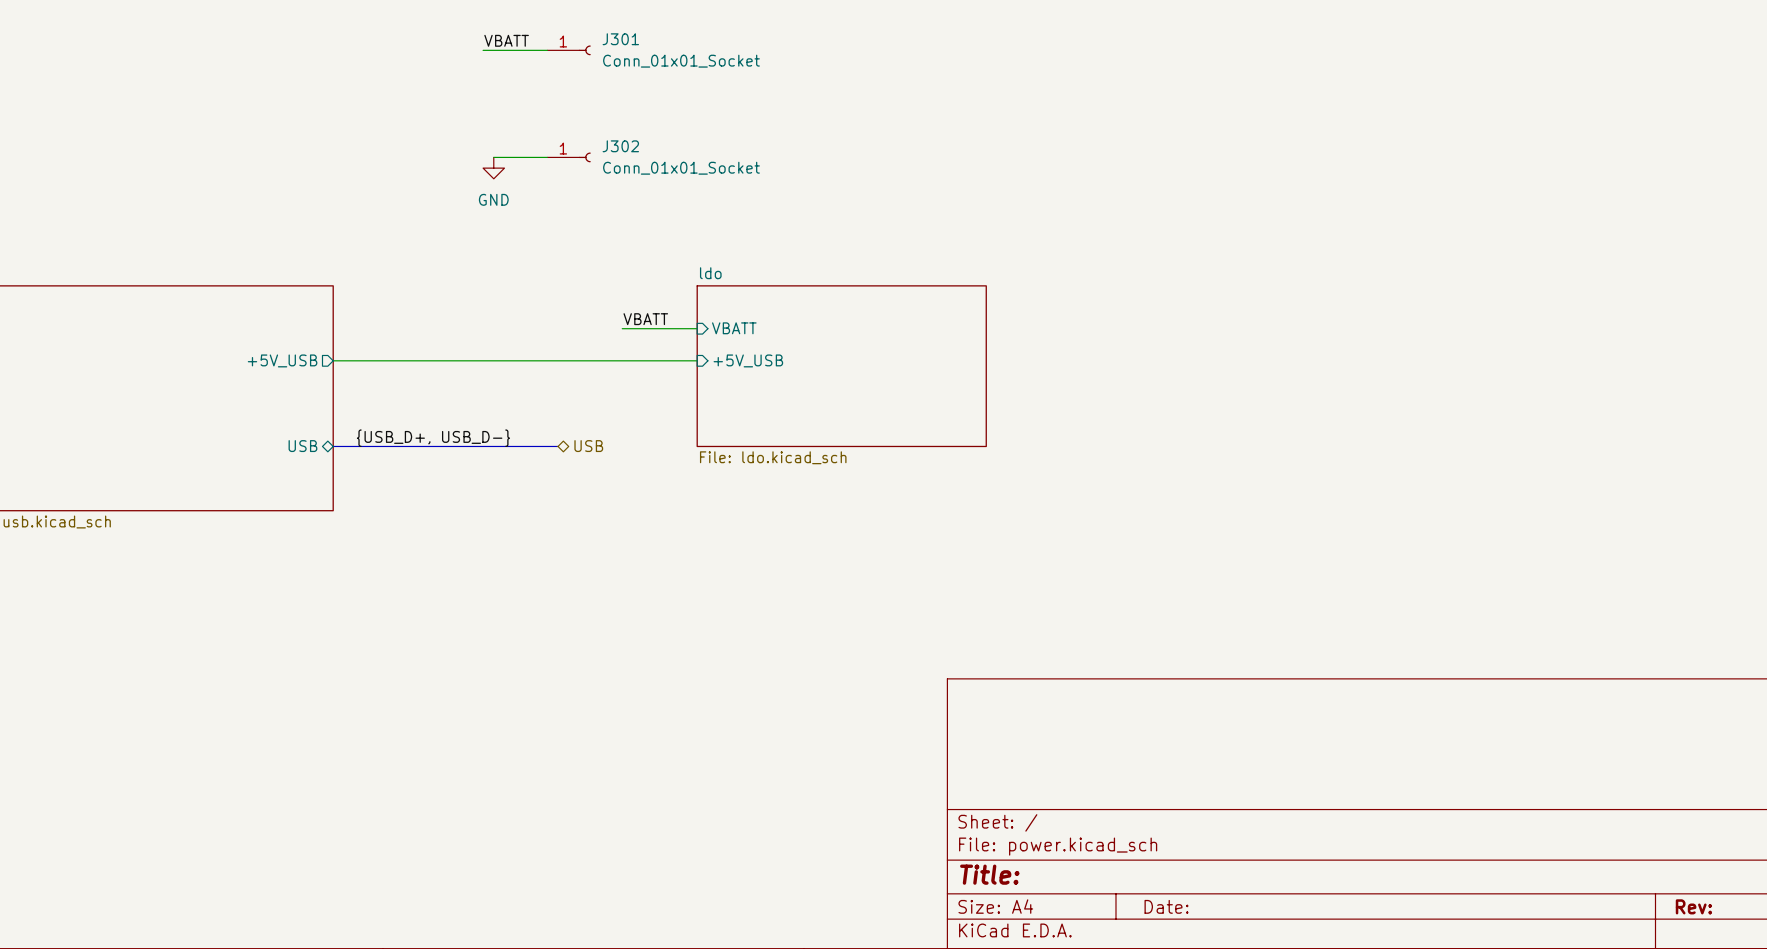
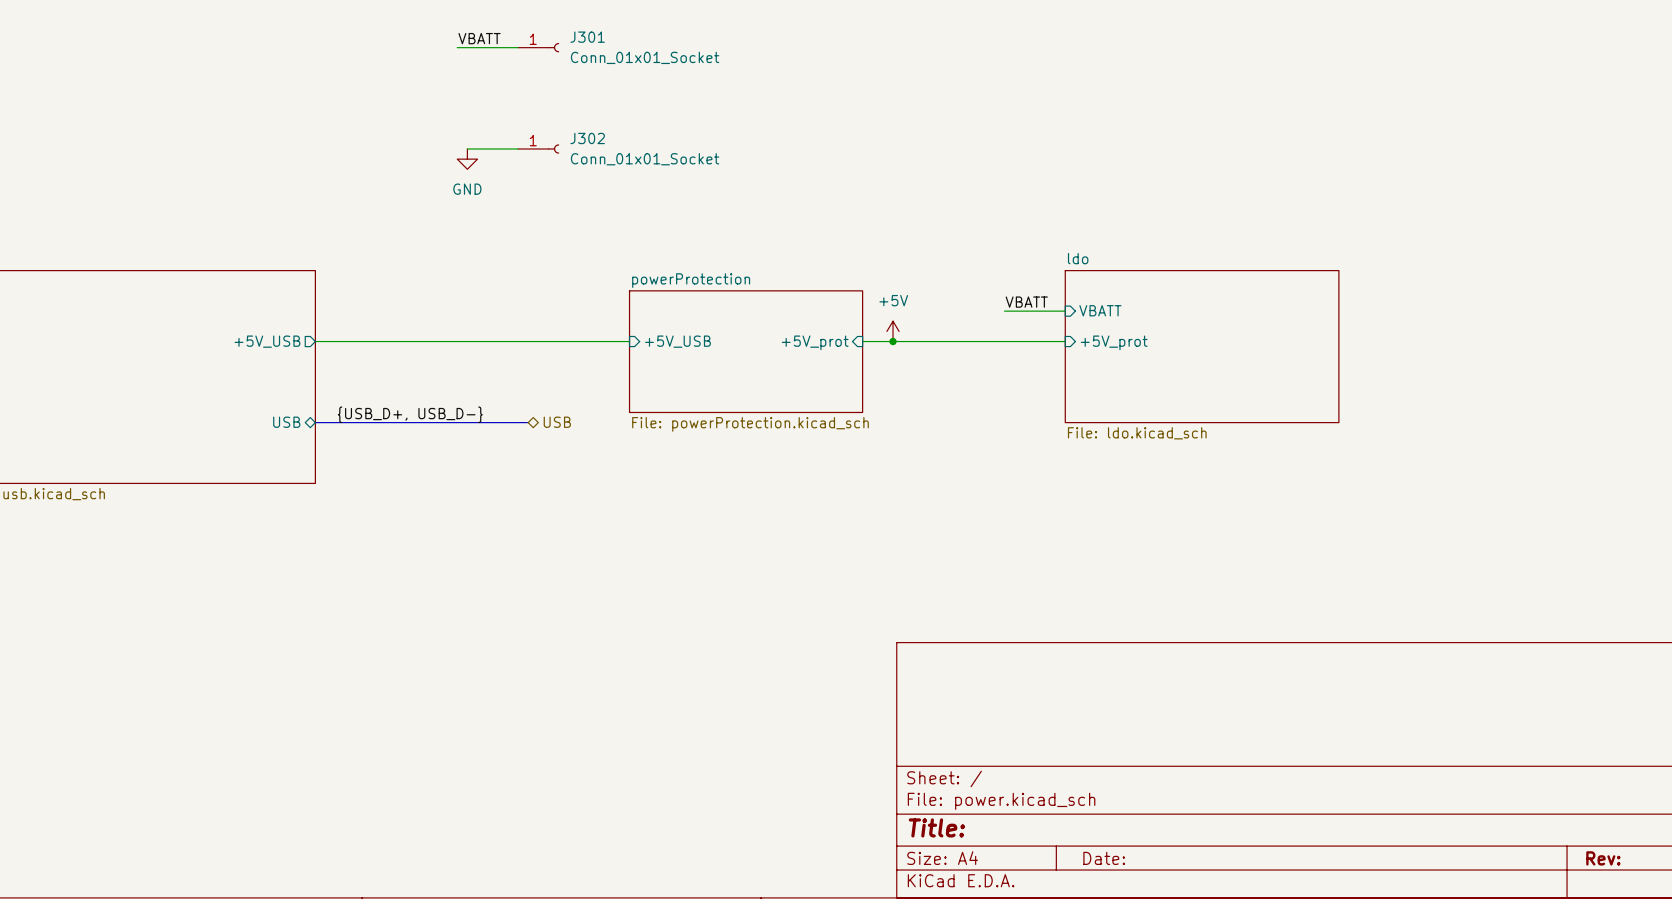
label: VBATT (645, 319) -> none
label: none -> VBATT (1026, 302)
wire: (622, 328) (697, 328) -> none
sheet pin: VBATT (734, 328) -> none
wire: none -> (1004, 311) (1065, 311)
sheet pin: none -> VBATT (1100, 310)
power symbol: none -> +5V (893, 331)
wire: (665, 360) (697, 360) -> none
sheet pin position: +5V_USB (748, 360) -> +5V_USB (677, 341)
wire: none -> (862, 341) (1065, 341)
junction: none -> (893, 341)
sheet pin: none -> +5V_prot (815, 342)
sheet pin: none -> +5V_prot (1114, 342)
sheet ldo: File: ldo.kicad_sch (841, 366) -> none
sheet ldo: none -> File: ldo.kicad_sch (1202, 346)
sheet powerProtection: none -> File: powerProtection.kicad_sch (746, 351)

